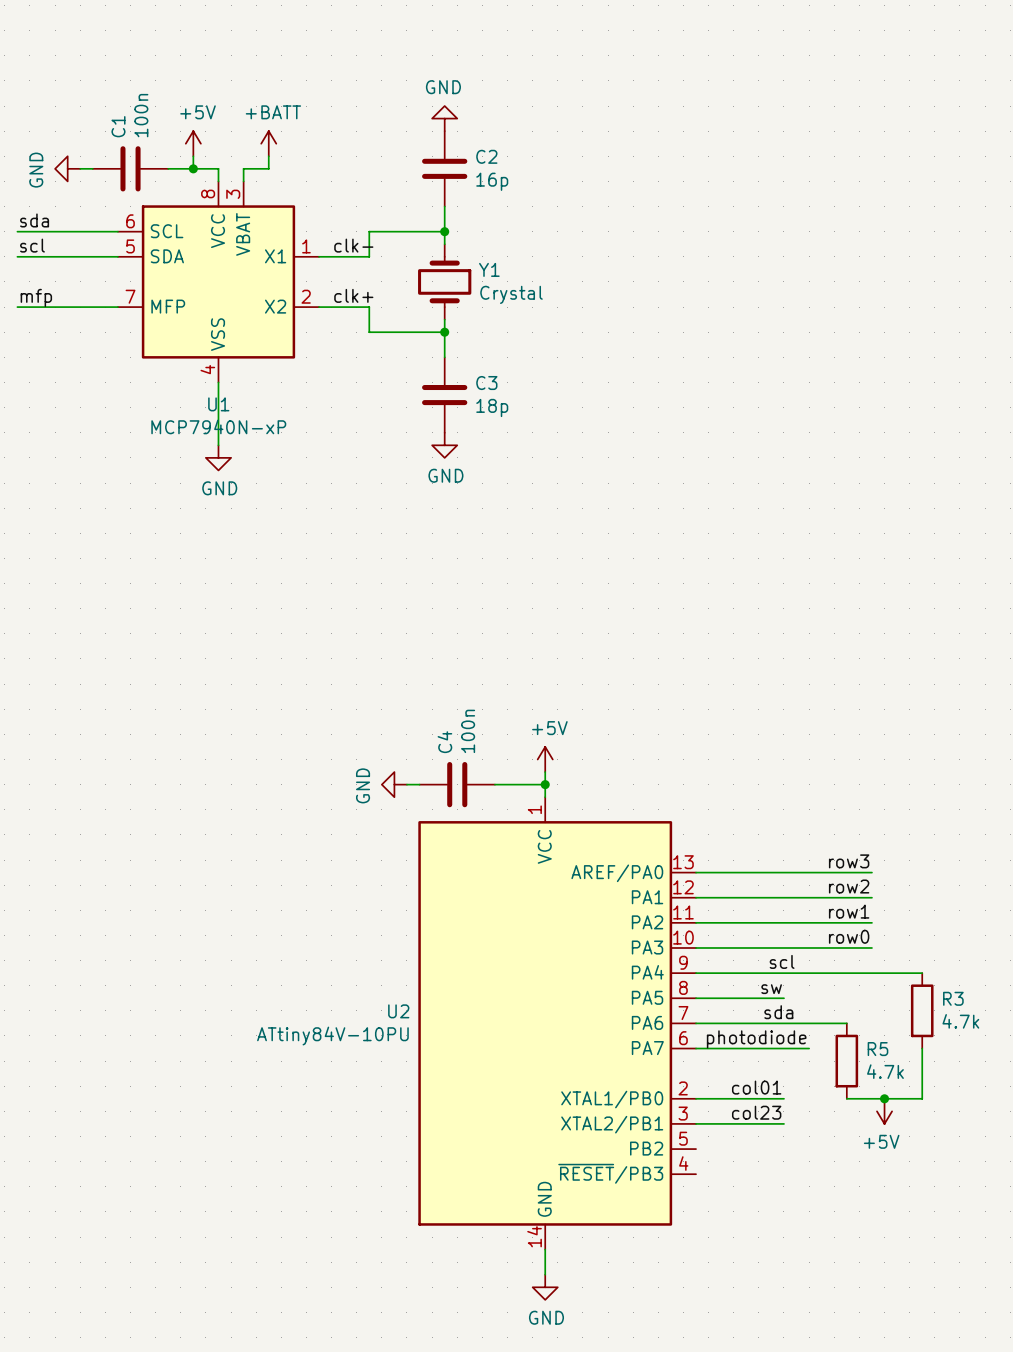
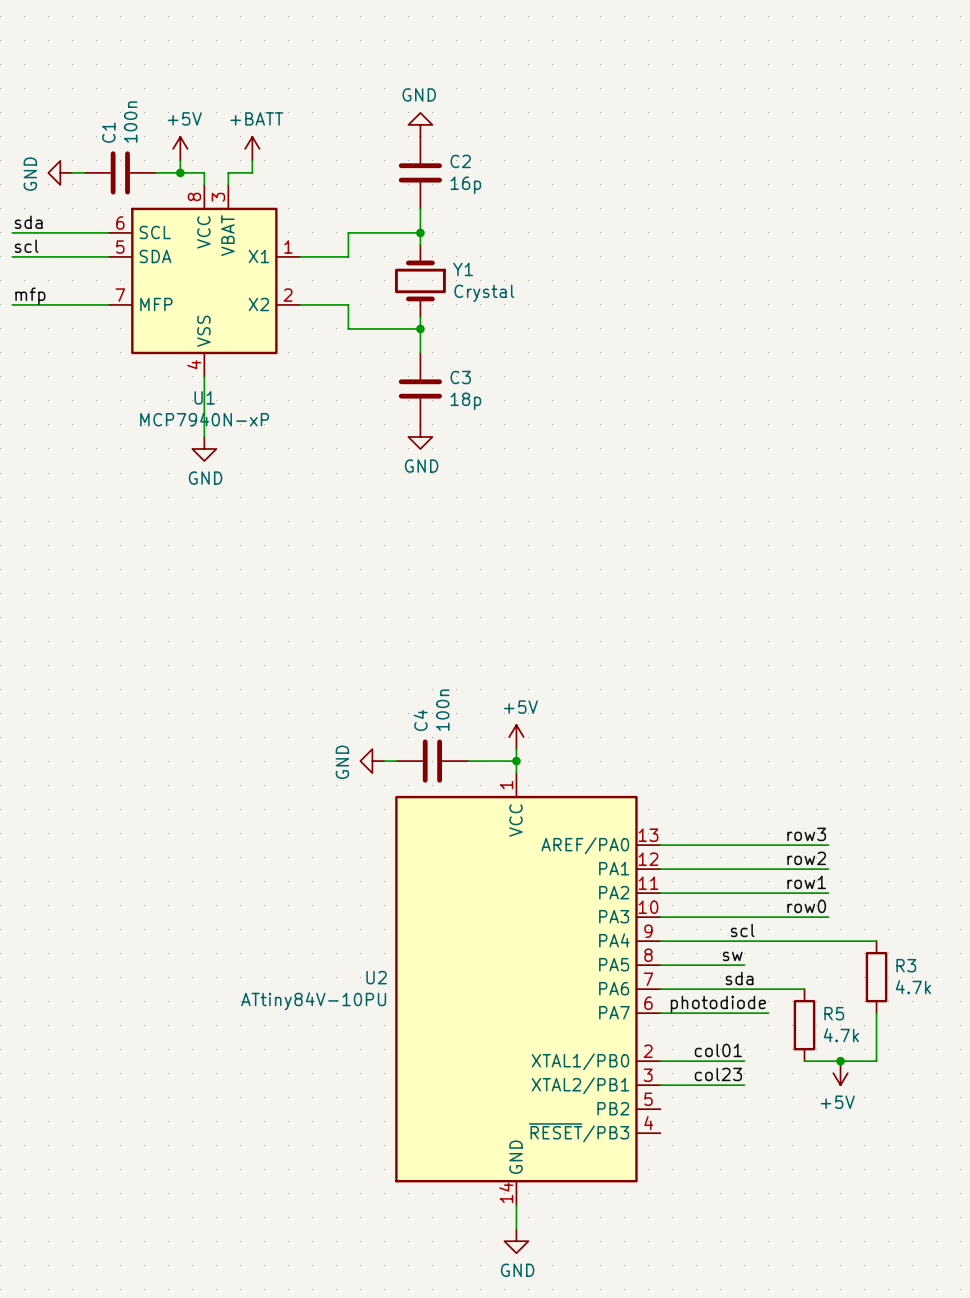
label: clk- (353, 245) -> none
label: clk+ (353, 295) -> none

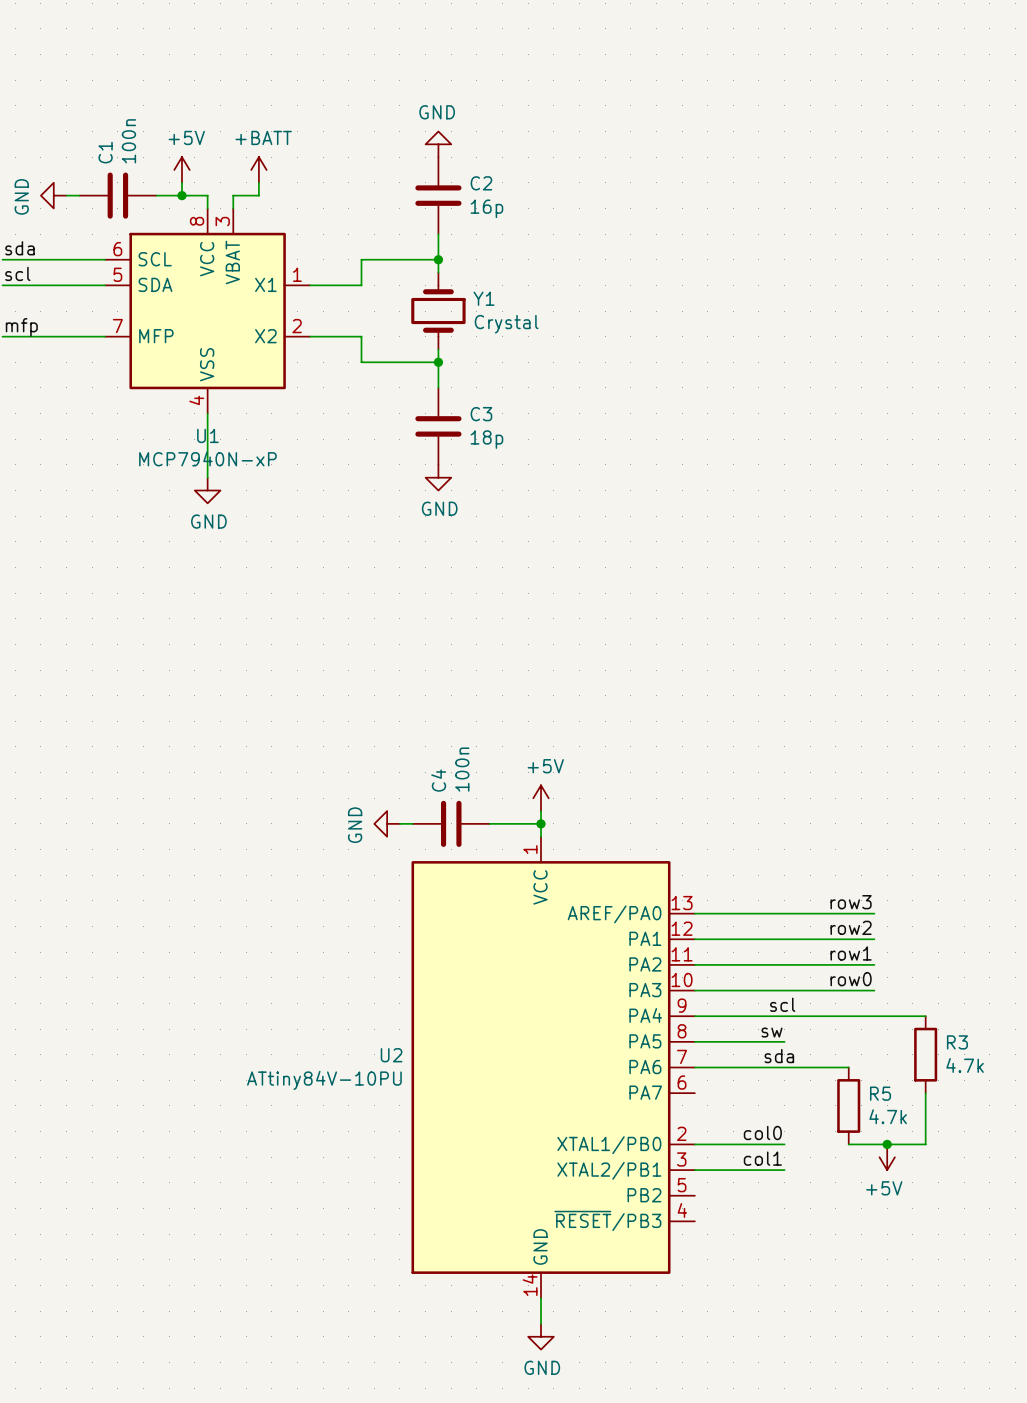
label: photodiode (718, 1004) -> none
wire: (660, 1013) (768, 1013) -> none
label: col01 (718, 1050) -> col0 (762, 1132)
label: col23 (718, 1074) -> col1 (762, 1158)

